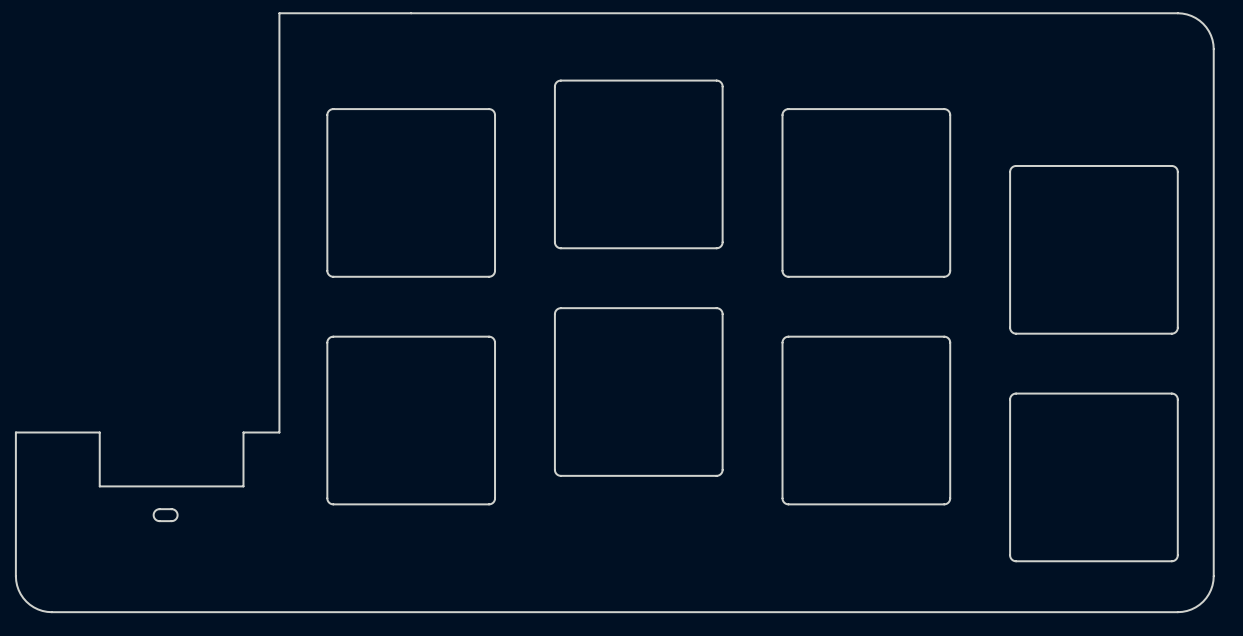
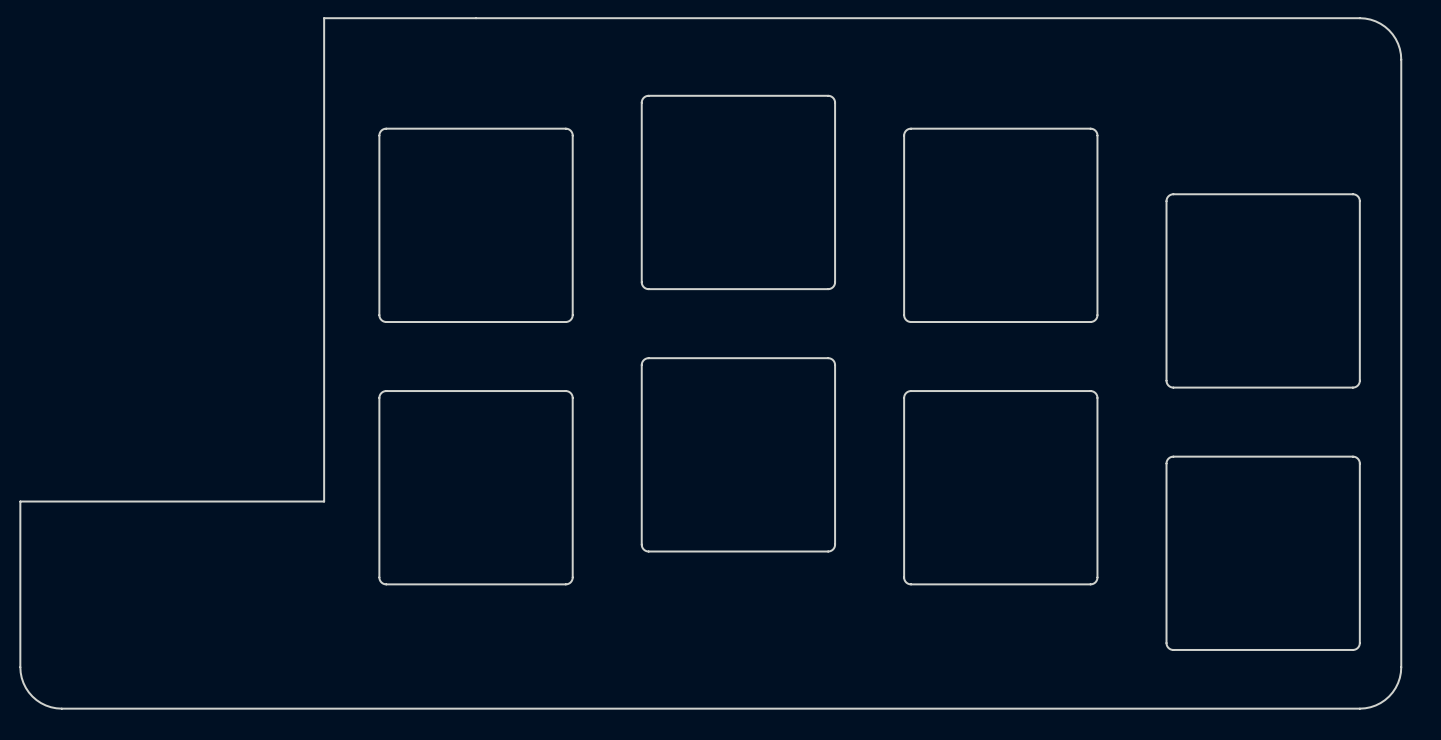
board edge: (99, 432) (99, 486) (243, 486) (243, 432) -> (117, 501) (282, 501)
board edge: (159, 509) (174, 509) (177, 513) (176, 518) (172, 521) (156, 520) (153, 513) (159, 509) -> none

